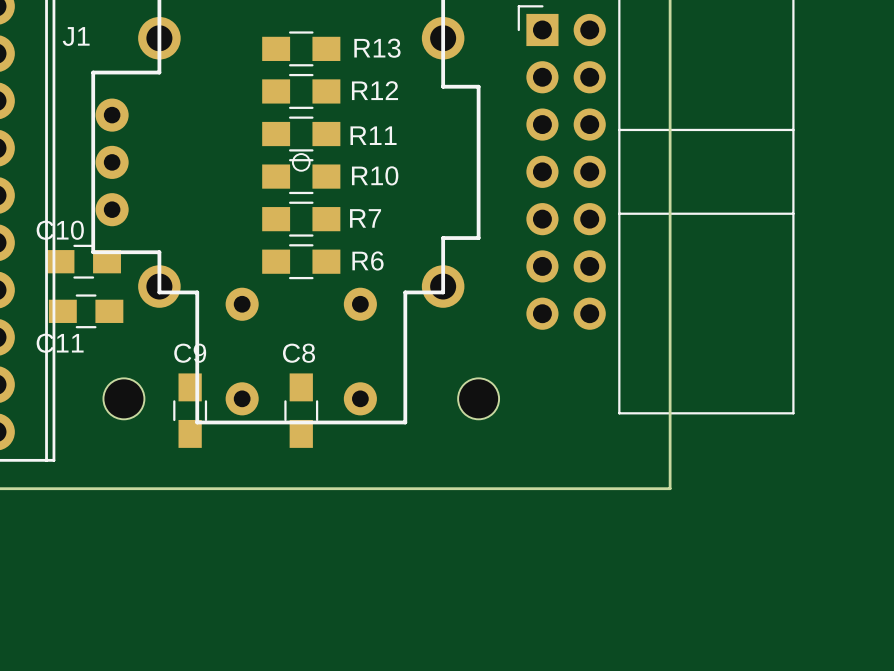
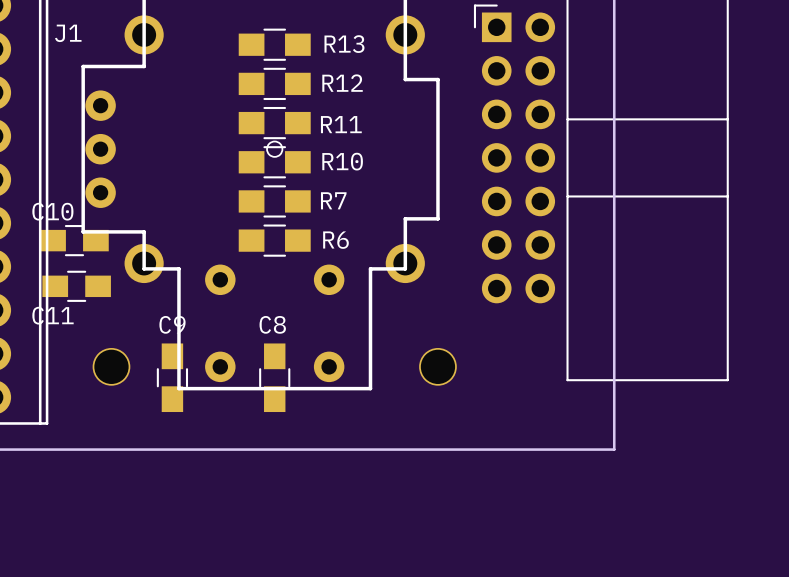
part footprint: [103, 378, 145, 420] -> [92, 348, 131, 386]
part footprint: [458, 378, 500, 420] -> [419, 348, 457, 386]

